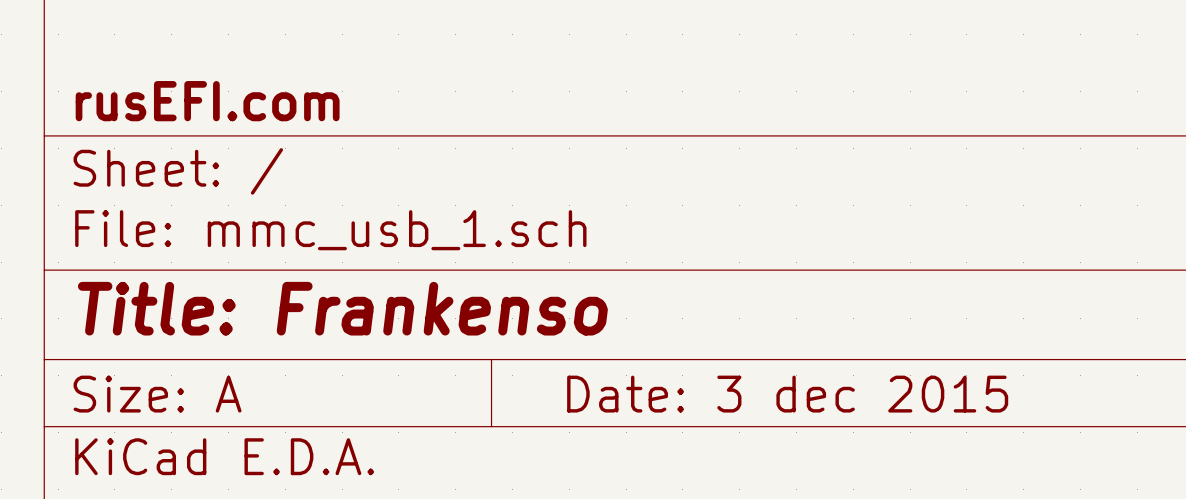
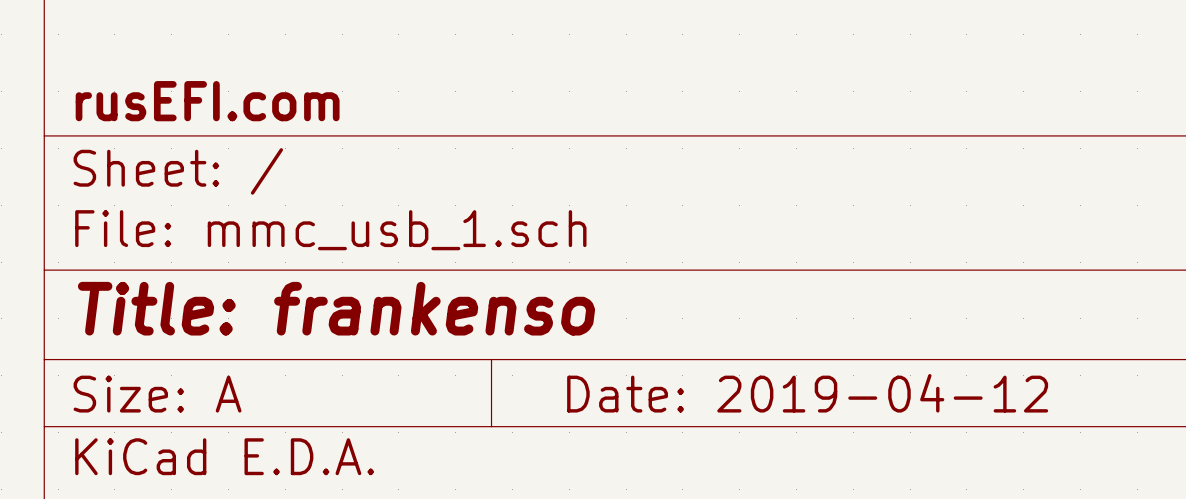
title block: Title: Frankenso (342, 308) -> Title: frankenso (336, 308)
title block: Date: 3 dec 2015 (787, 394) -> Date: 2019-04-12 (807, 393)

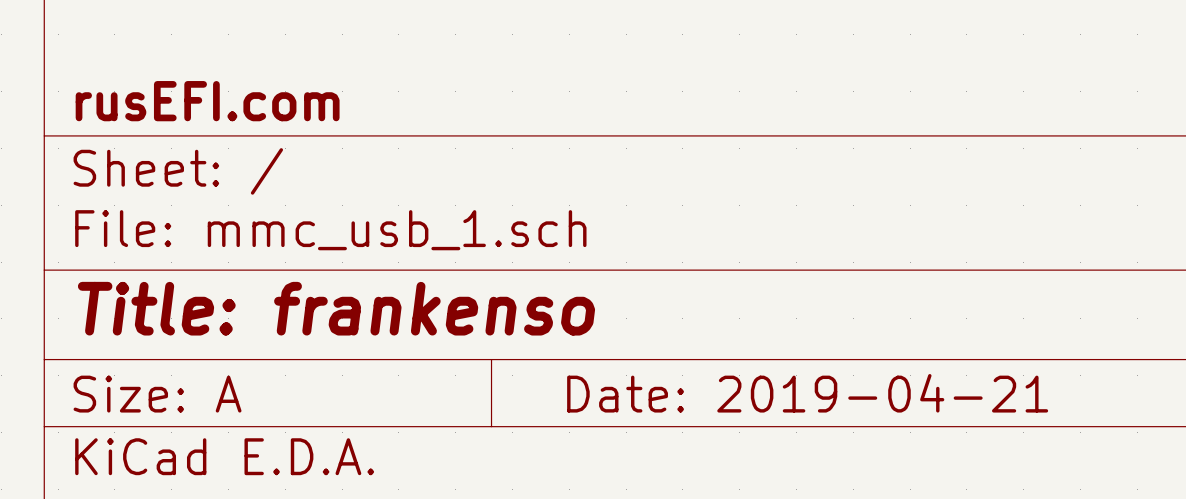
title block: Date: 2019-04-12 (807, 393) -> Date: 2019-04-21 (807, 393)

